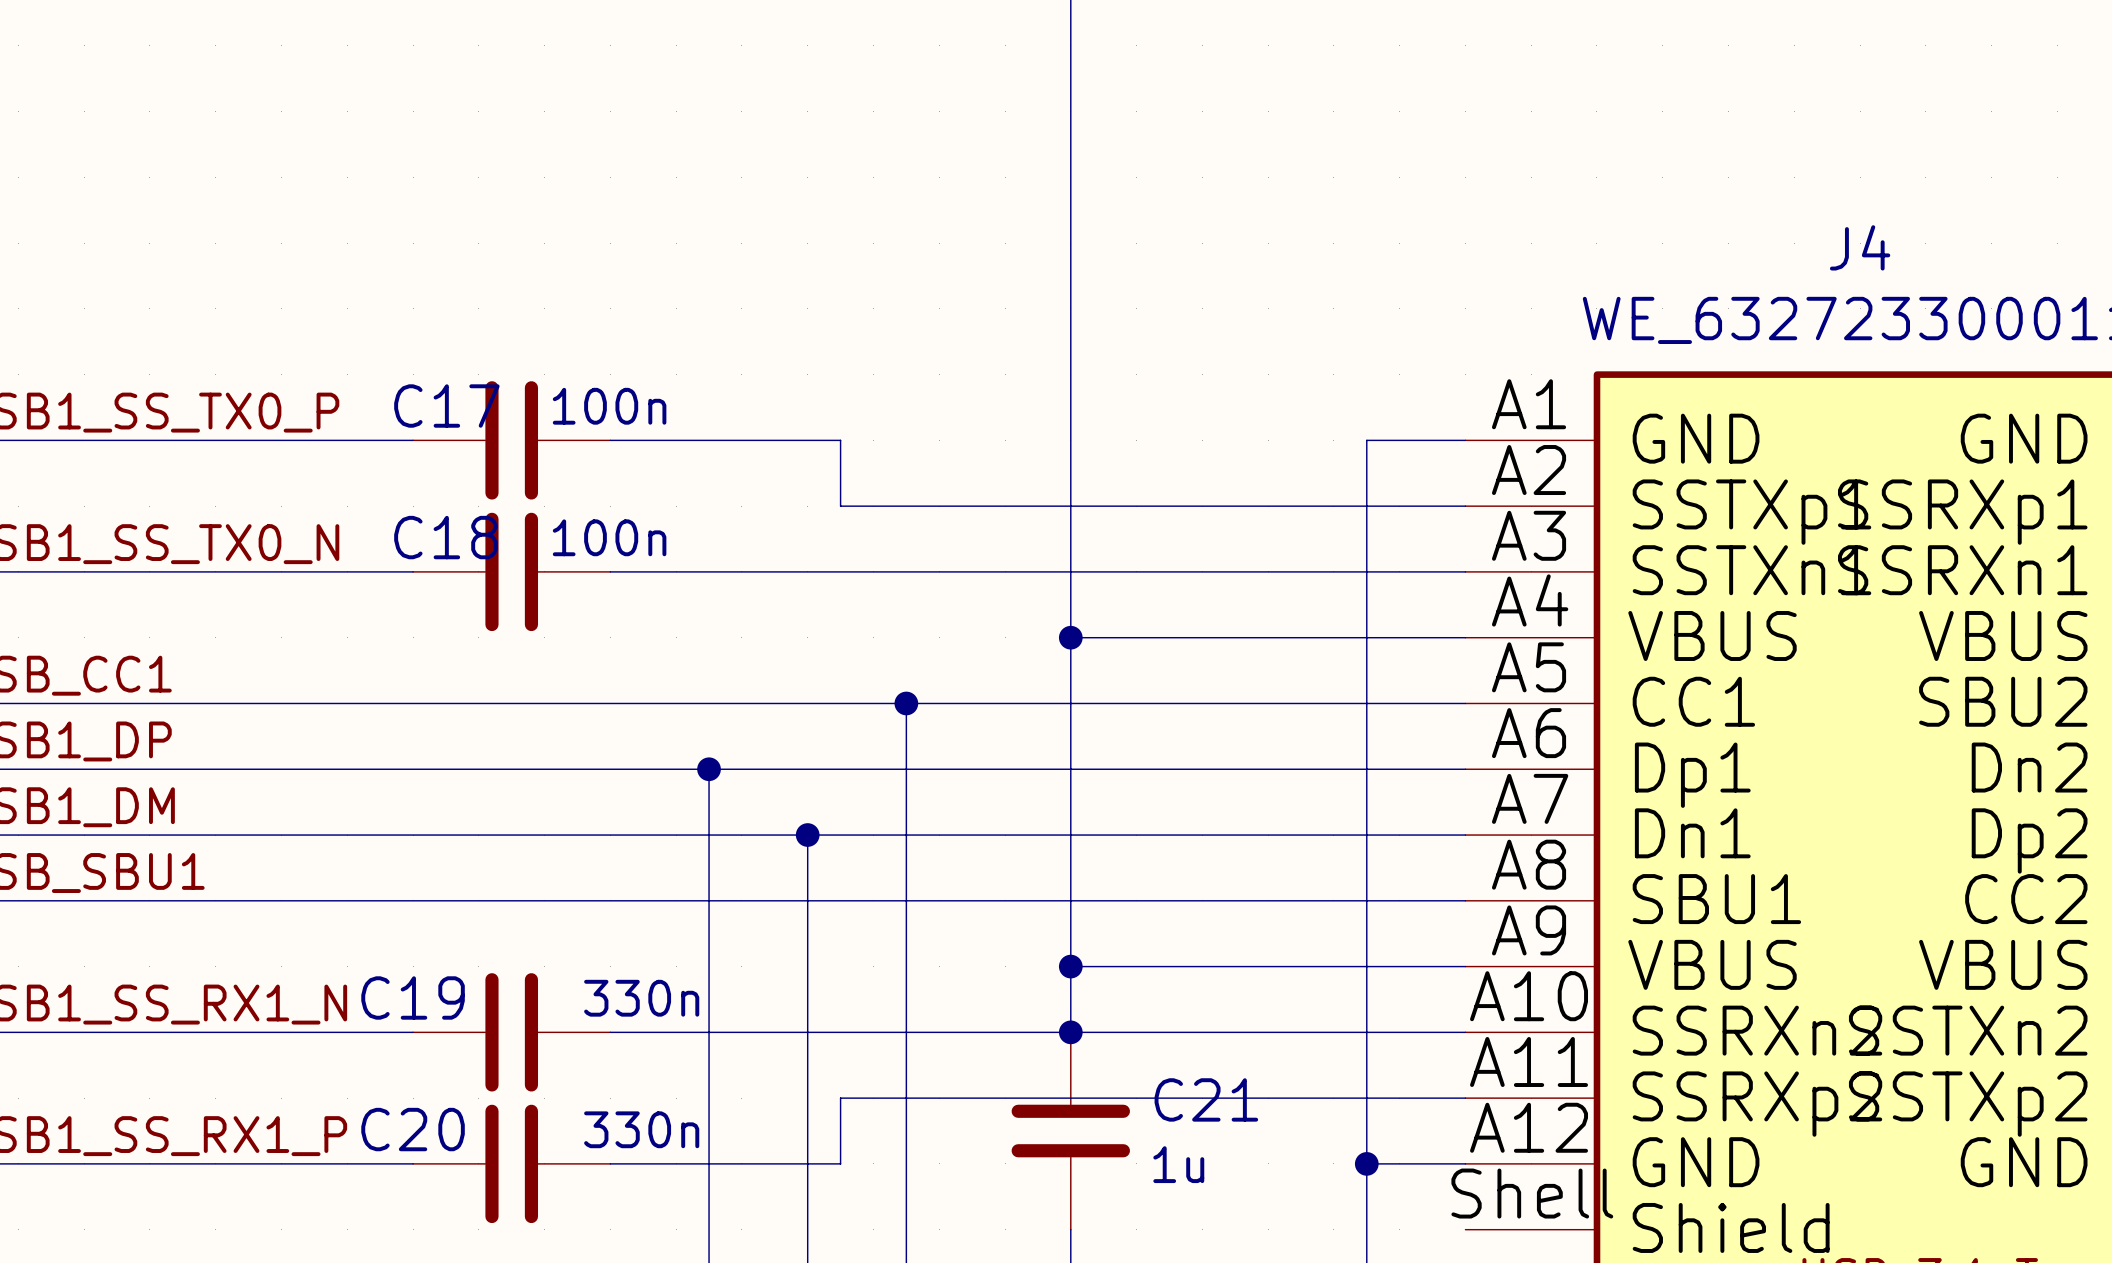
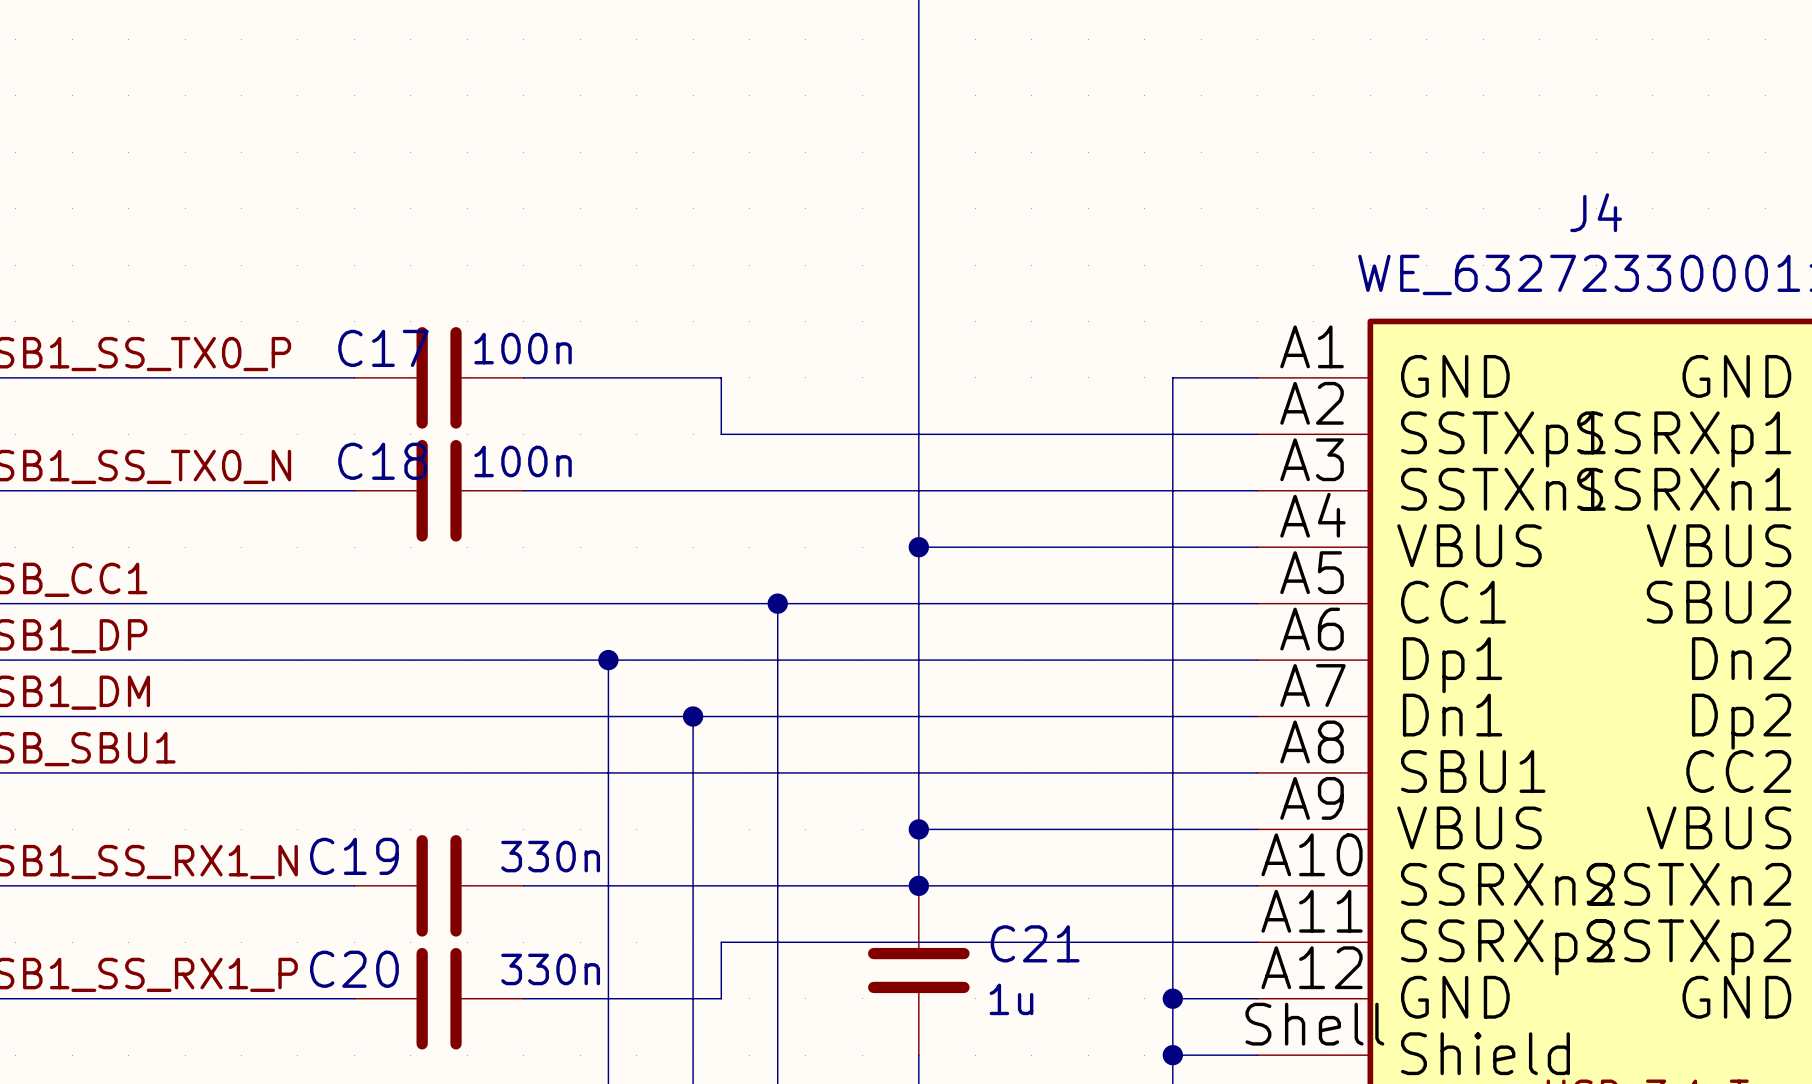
wire: none -> (1172, 1055) (1257, 1055)
junction: none -> (1172, 1055)

